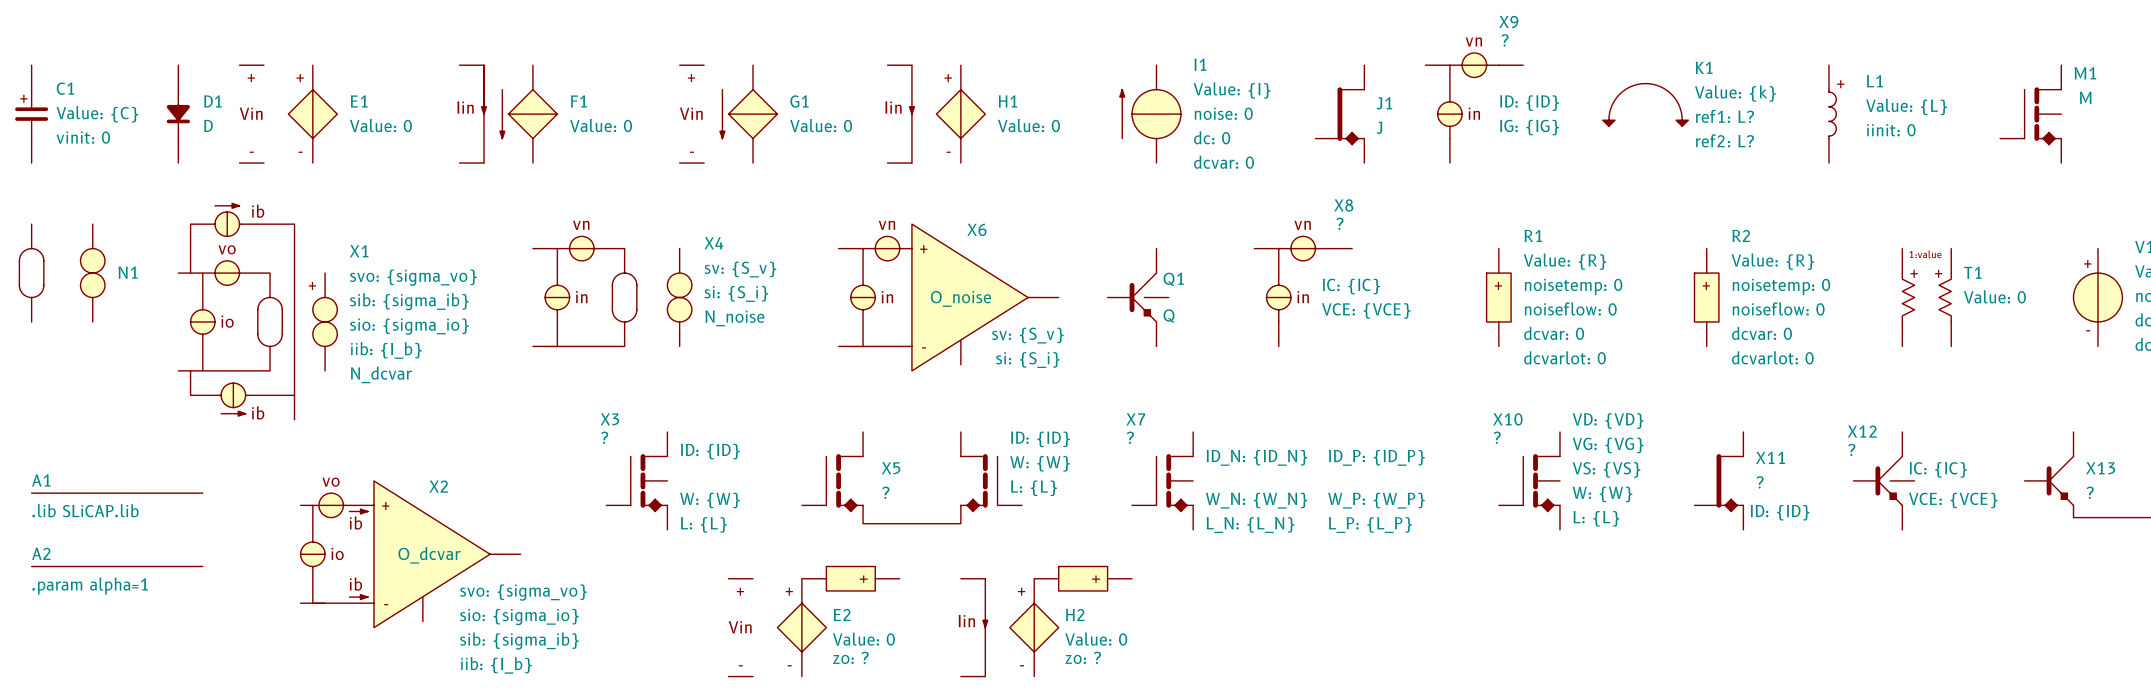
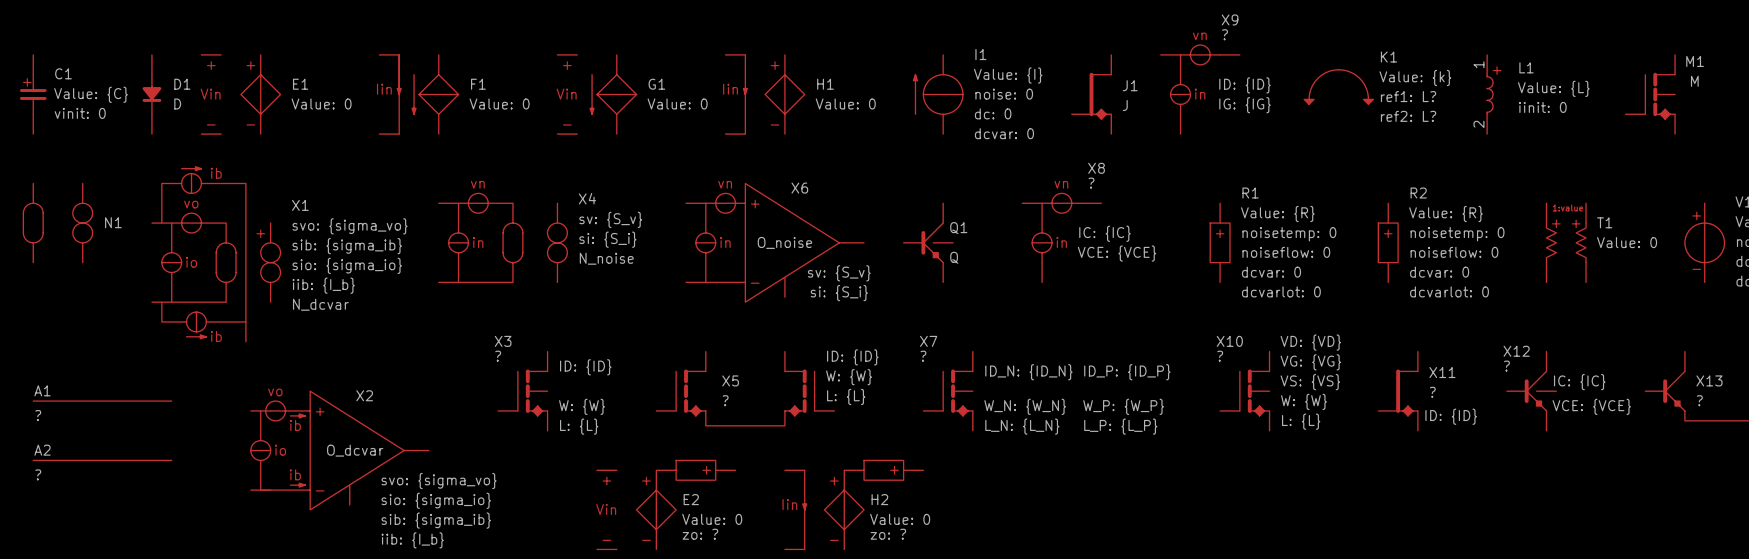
L1 pin number: none -> 1 (1478, 64)
L1 pin number: none -> 2 (1478, 124)
A1 text: .lib SLiCAP.lib (85, 510) -> ? (38, 415)
A2 text: .param alpha=1 (90, 586) -> ? (38, 474)

